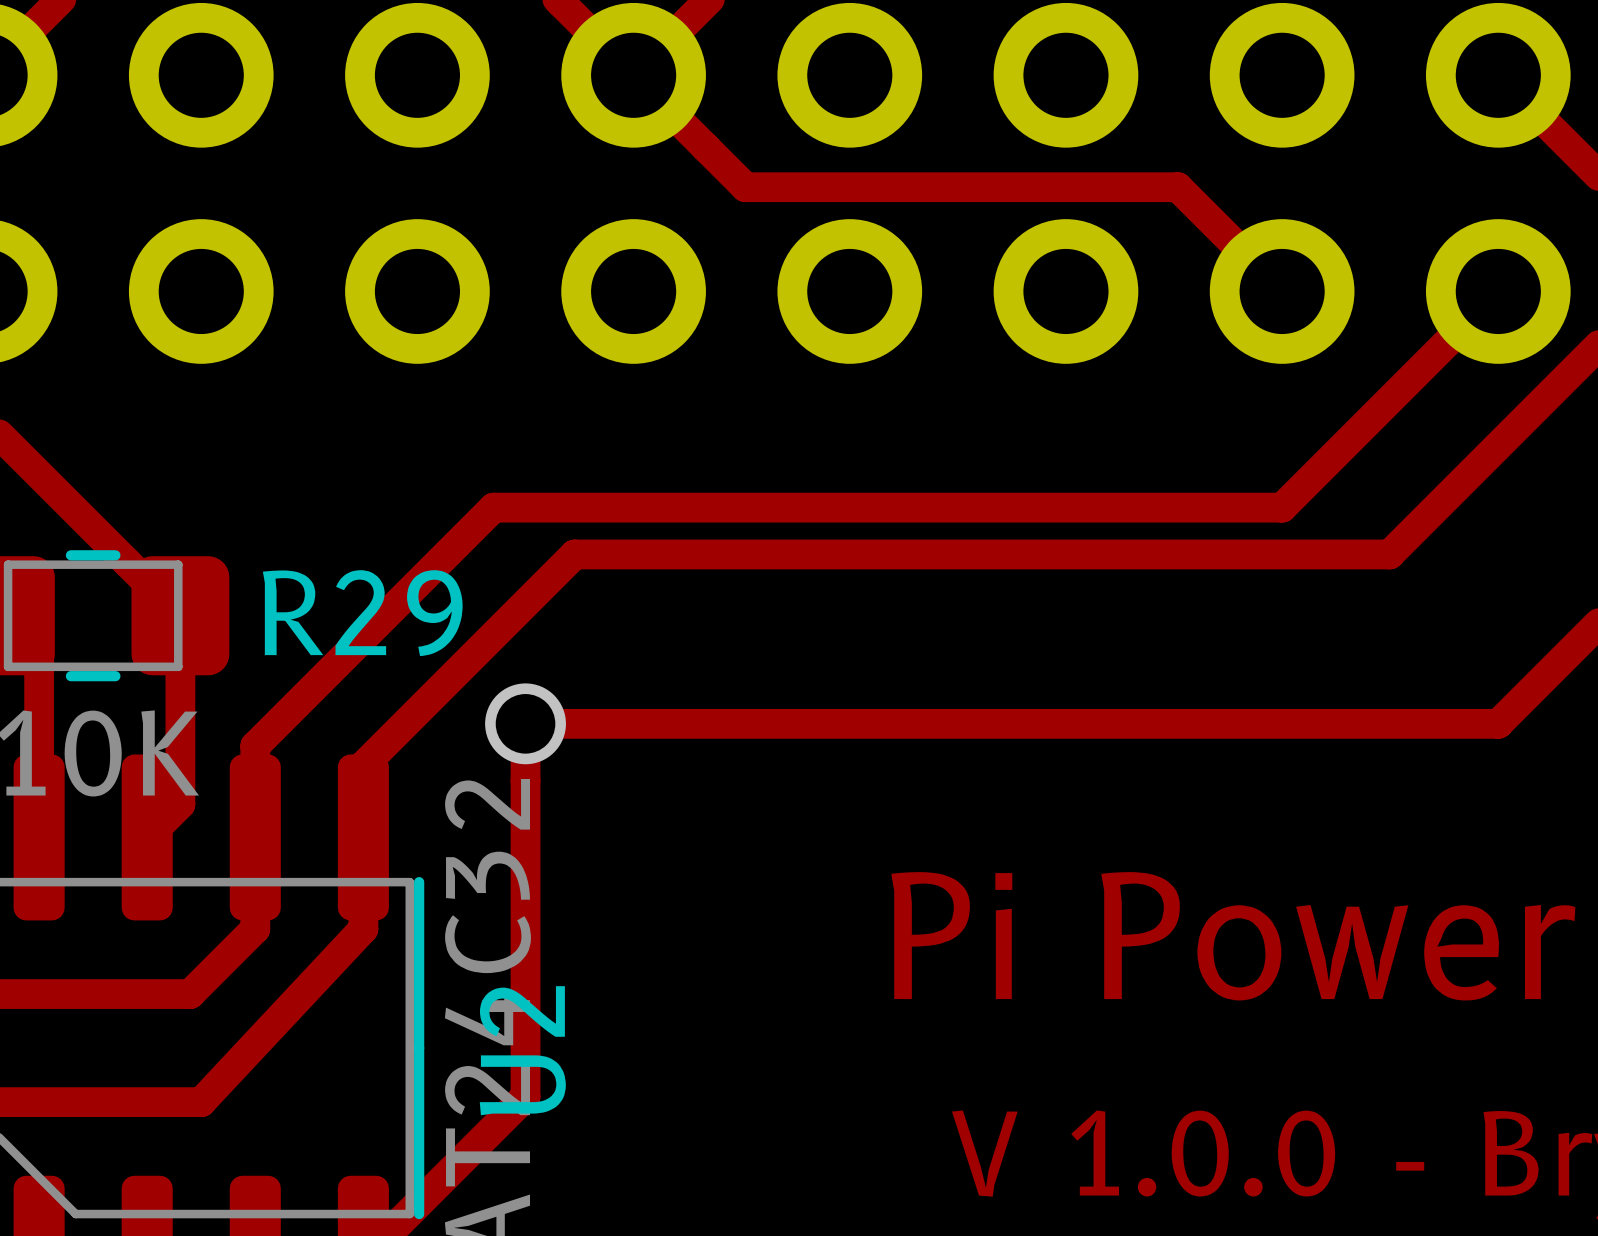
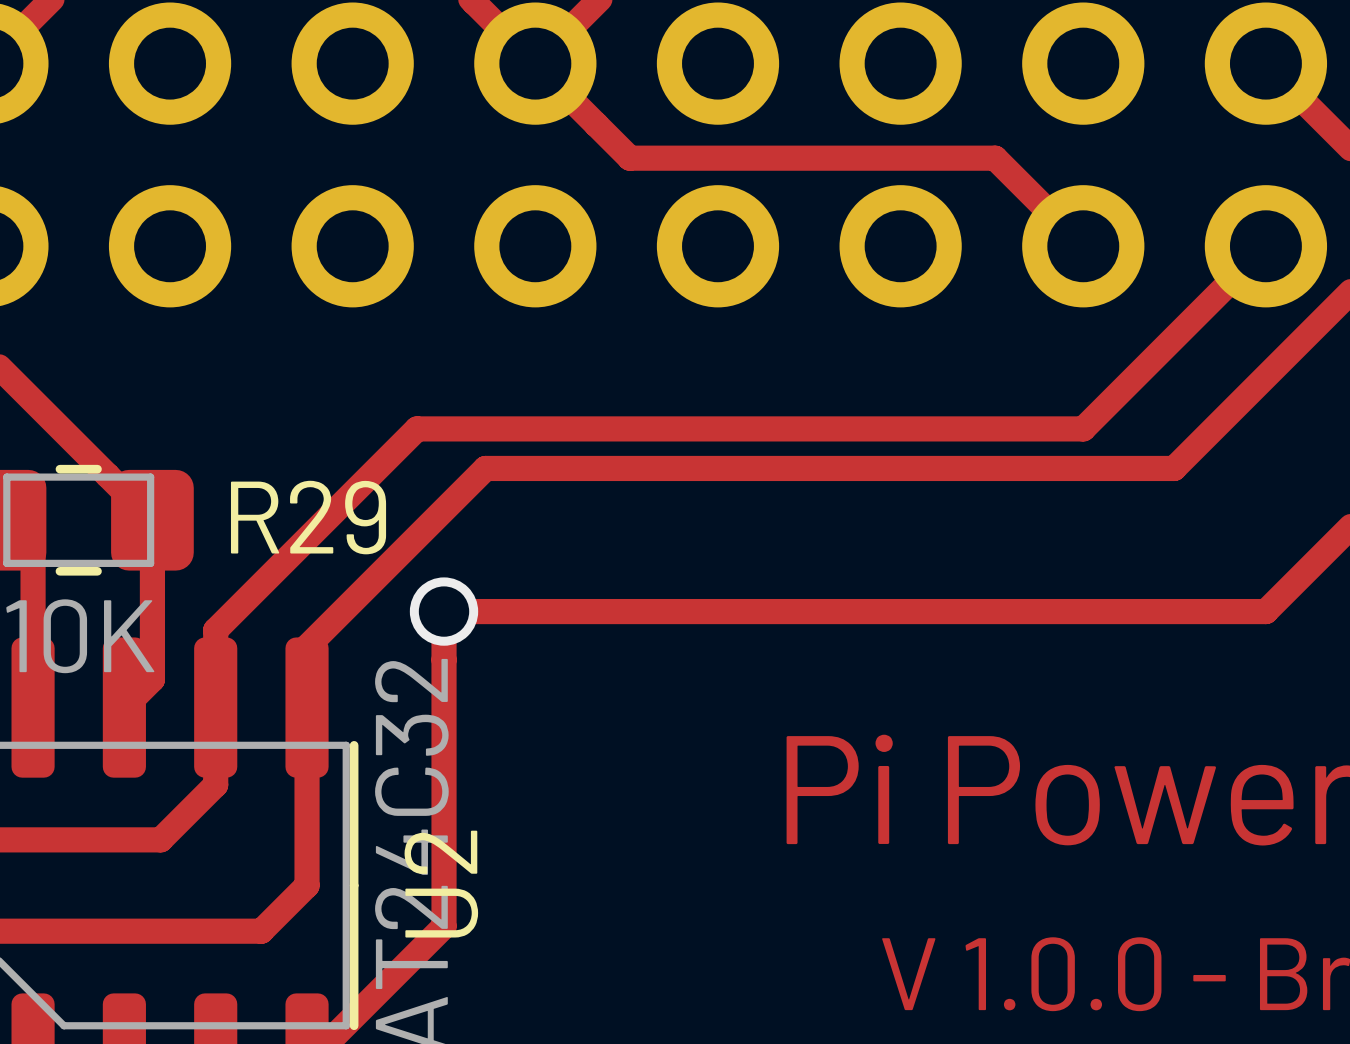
track: (363, 928) (201, 1102) -> (307, 784) (307, 885) (261, 931) (170, 931)

